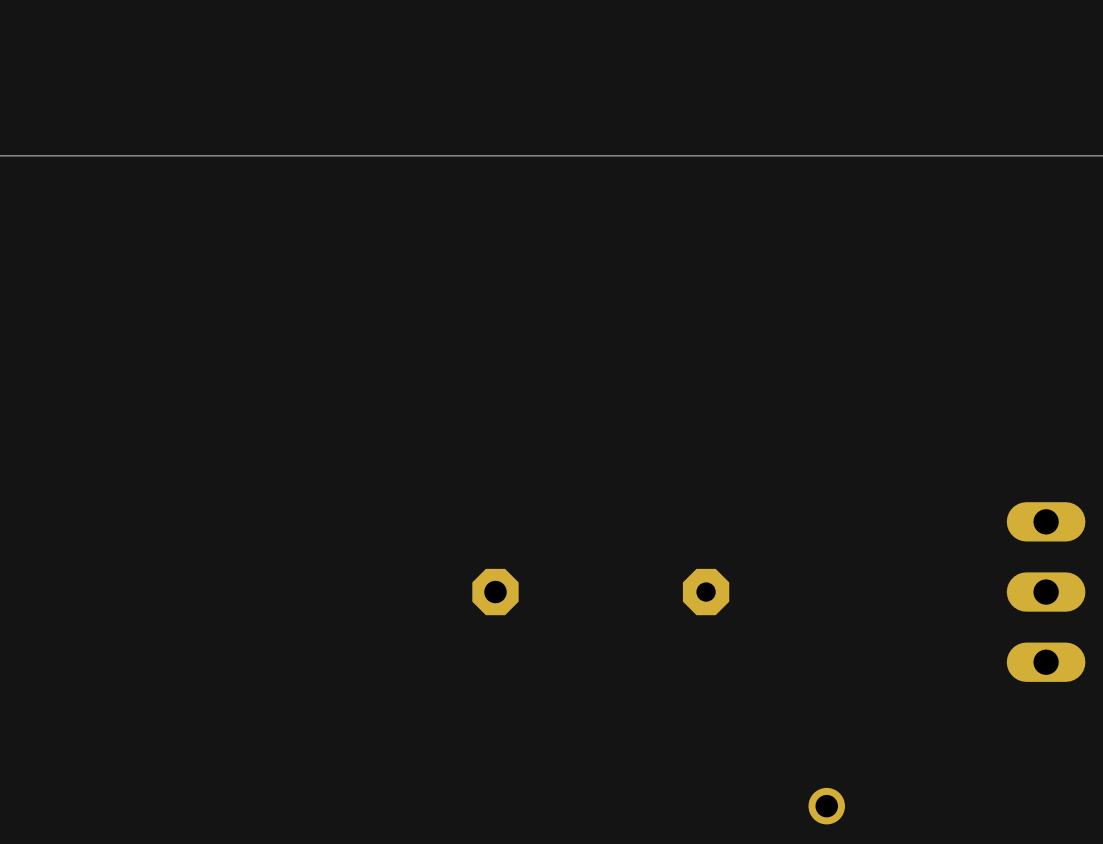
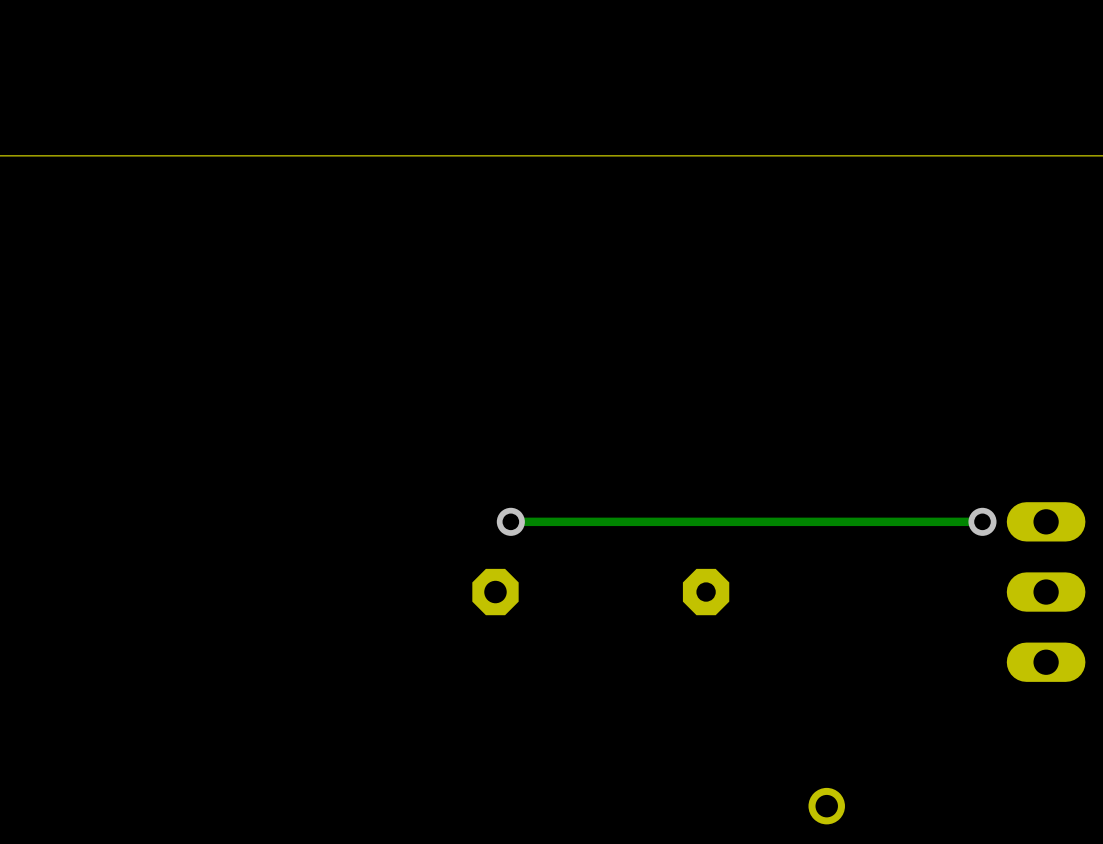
via: none -> (510, 521)
track: none -> (982, 521) (510, 521)
via: none -> (982, 521)

